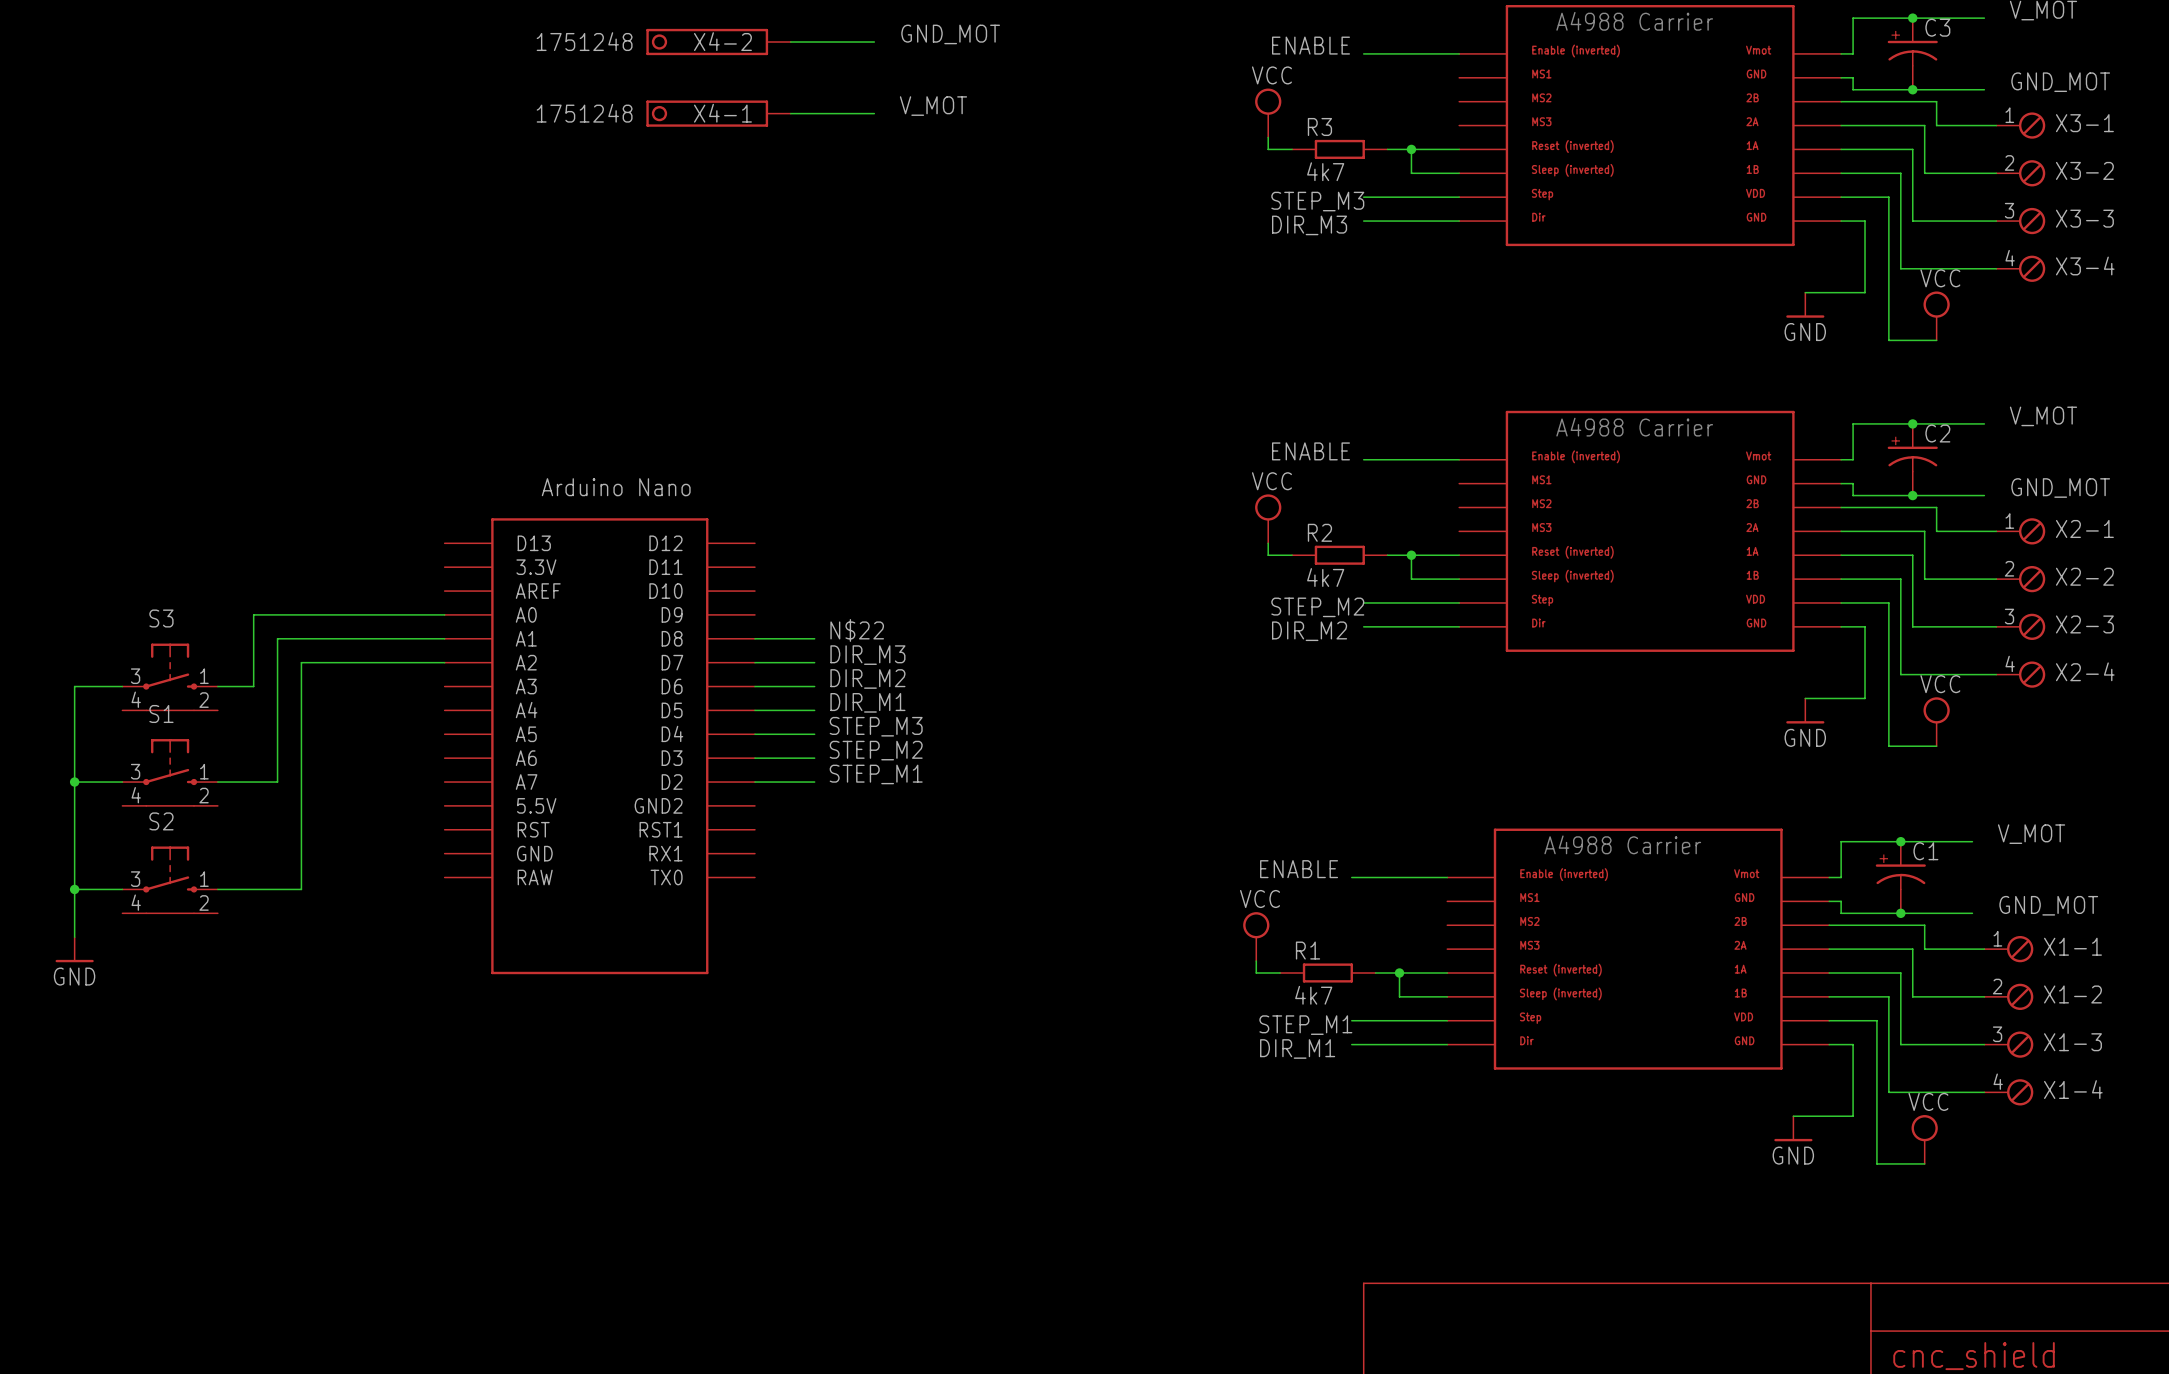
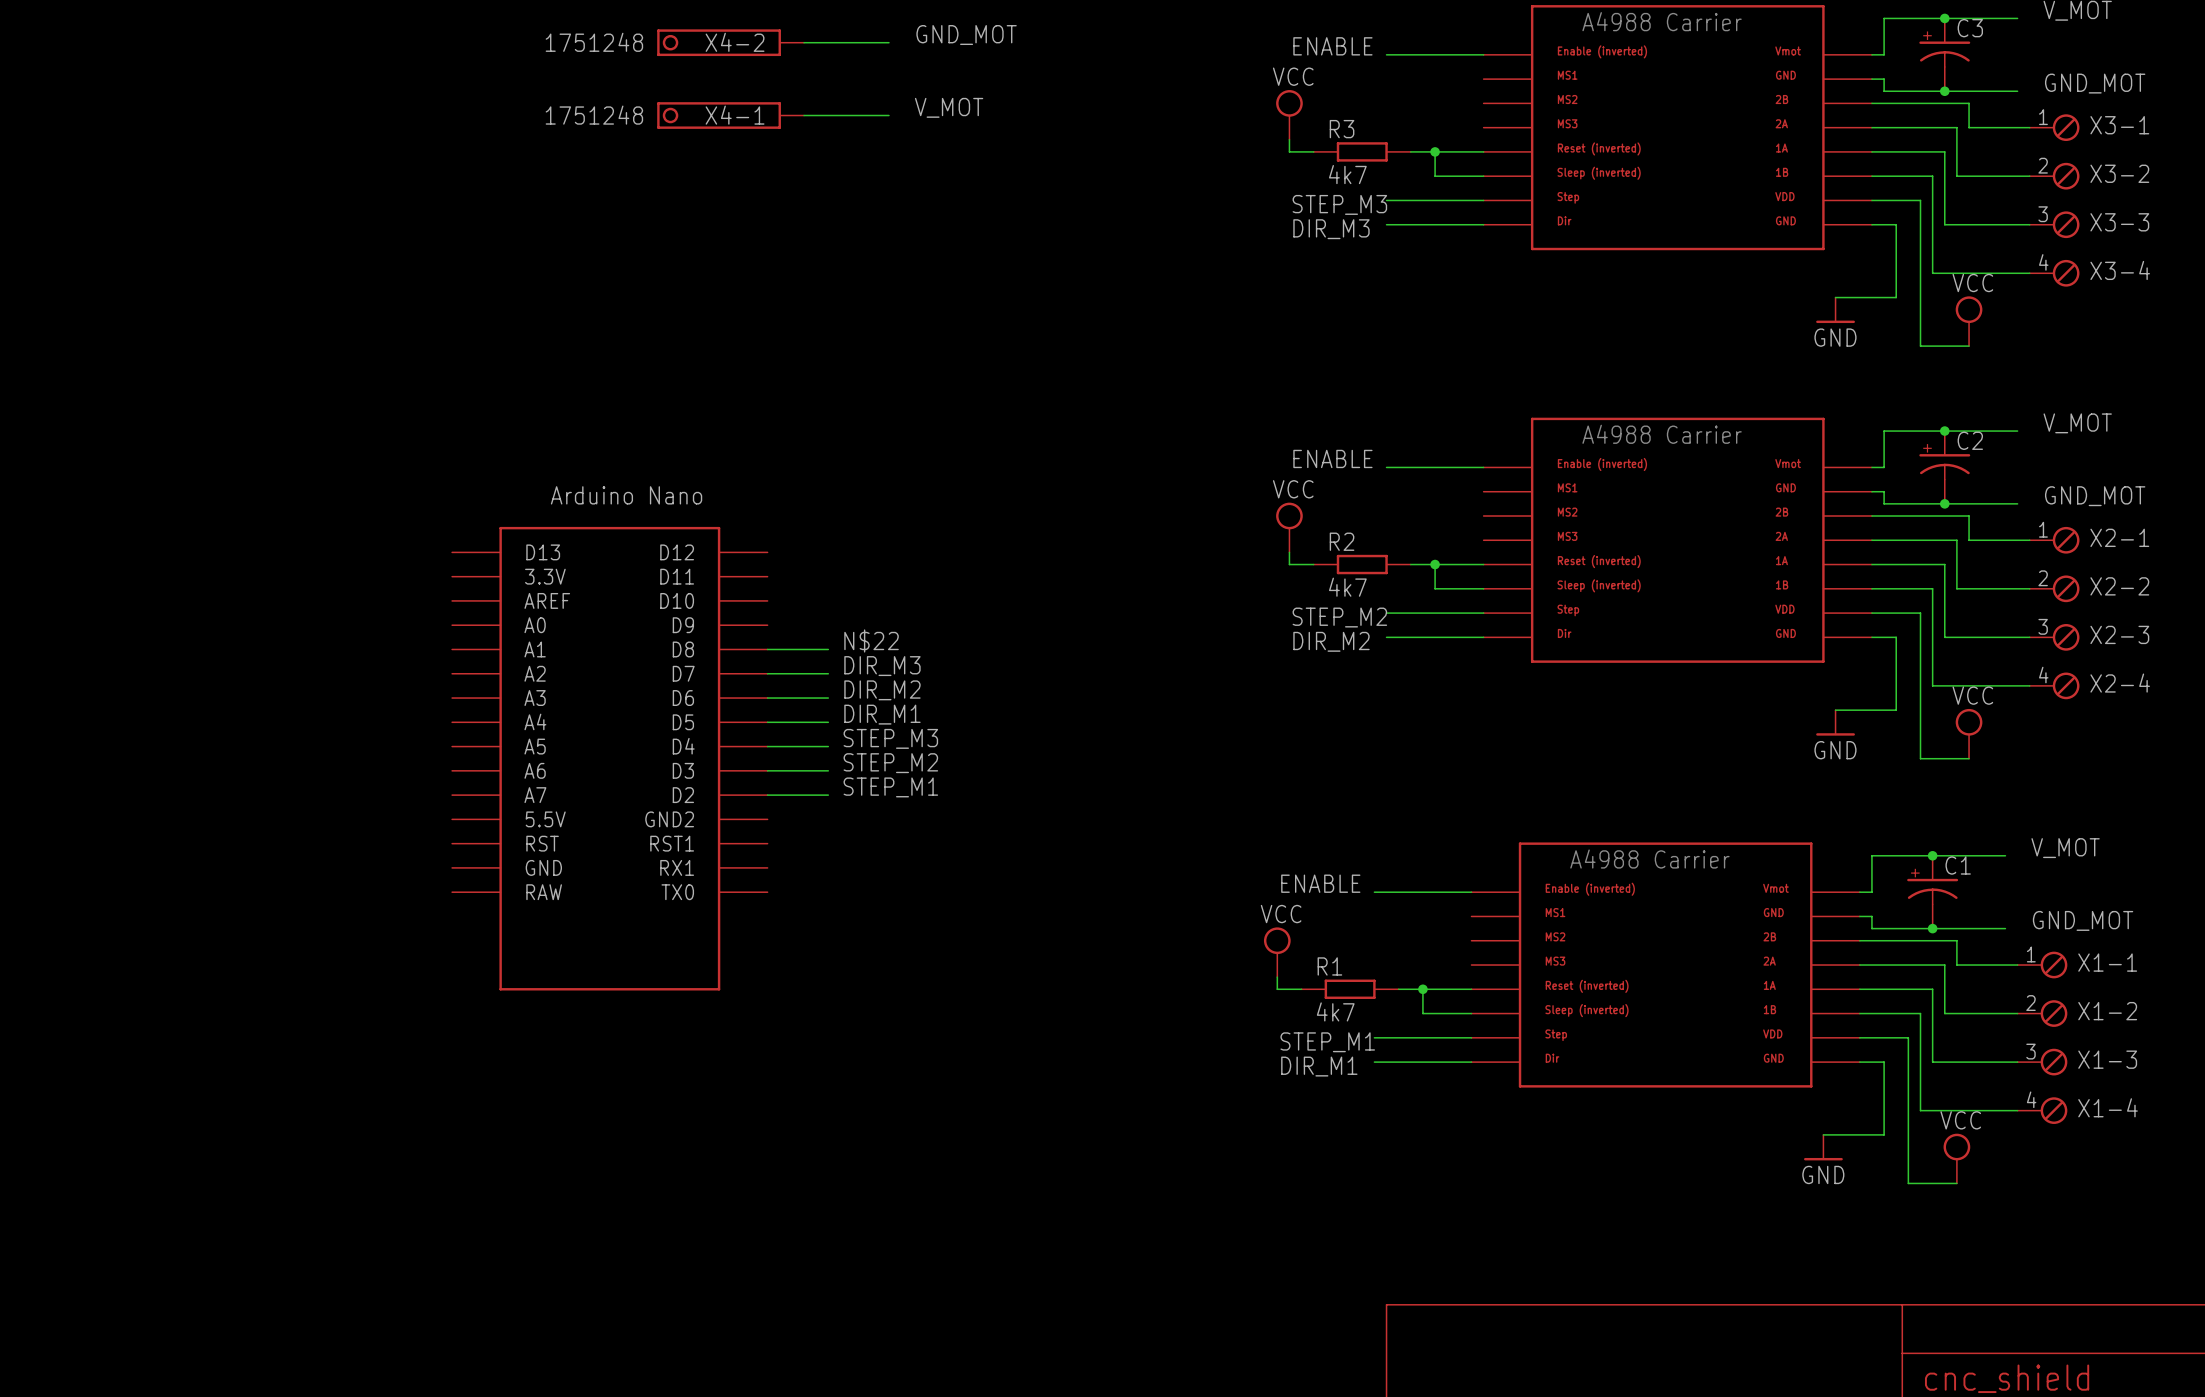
wire: (444, 614) (253, 614) (253, 686) (217, 686) -> none
wire: (444, 638) (277, 638) (277, 782) (217, 782) -> none
wire: (444, 662) (301, 662) (301, 889) (217, 889) -> none
S3: (170, 677) -> none
wire: (122, 686) (74, 686) (74, 937) -> none
S1: (170, 772) -> none
wire: (74, 782) (122, 782) -> none
junction: (74, 782) -> none
S2: (170, 880) -> none
wire: (74, 889) (122, 889) -> none
junction: (74, 889) -> none
power symbol: GND (74, 949) -> none

